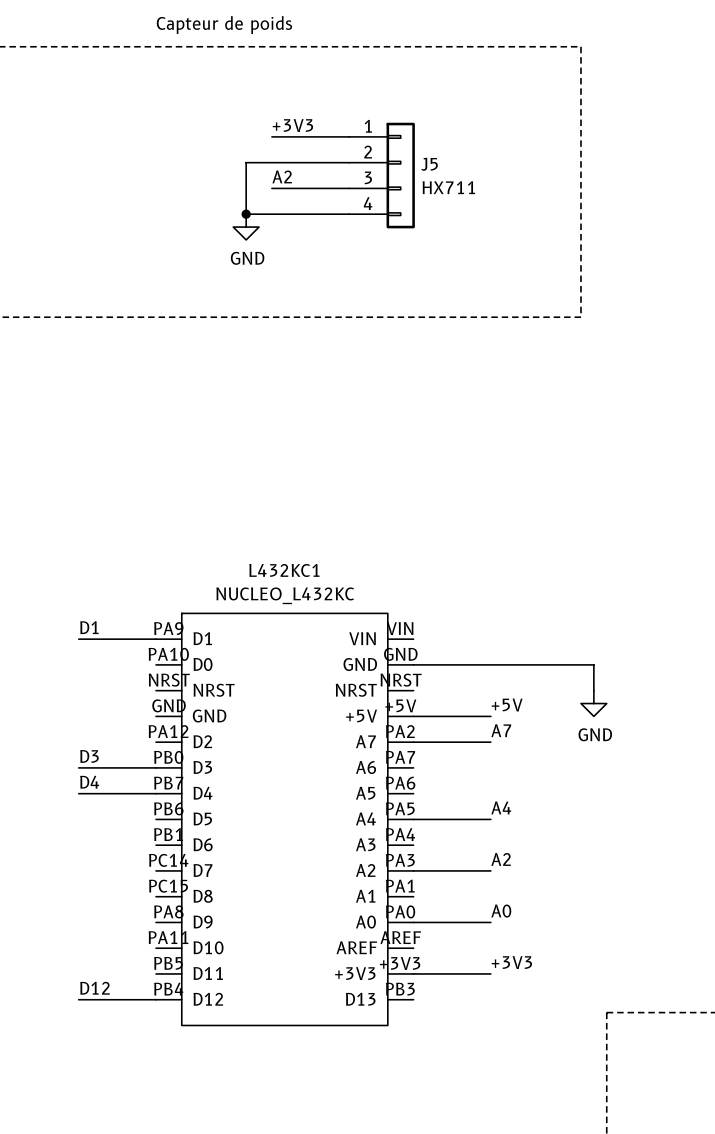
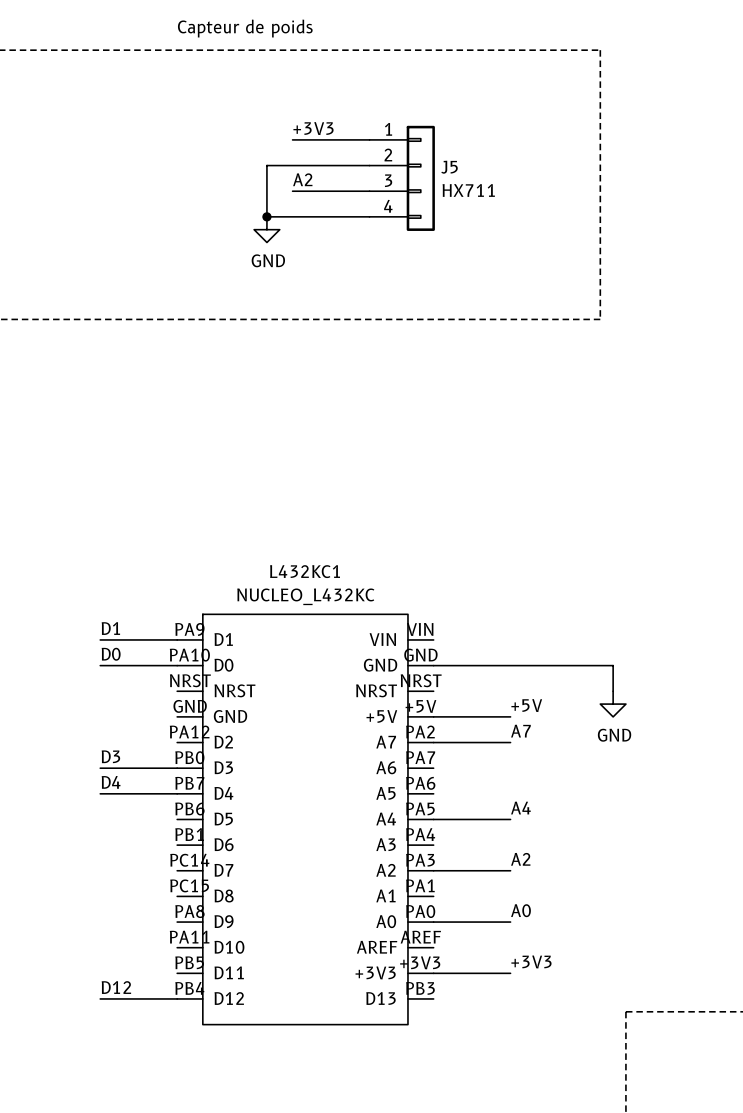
label: none -> D0 (111, 654)
wire: none -> (100, 665) (177, 665)

